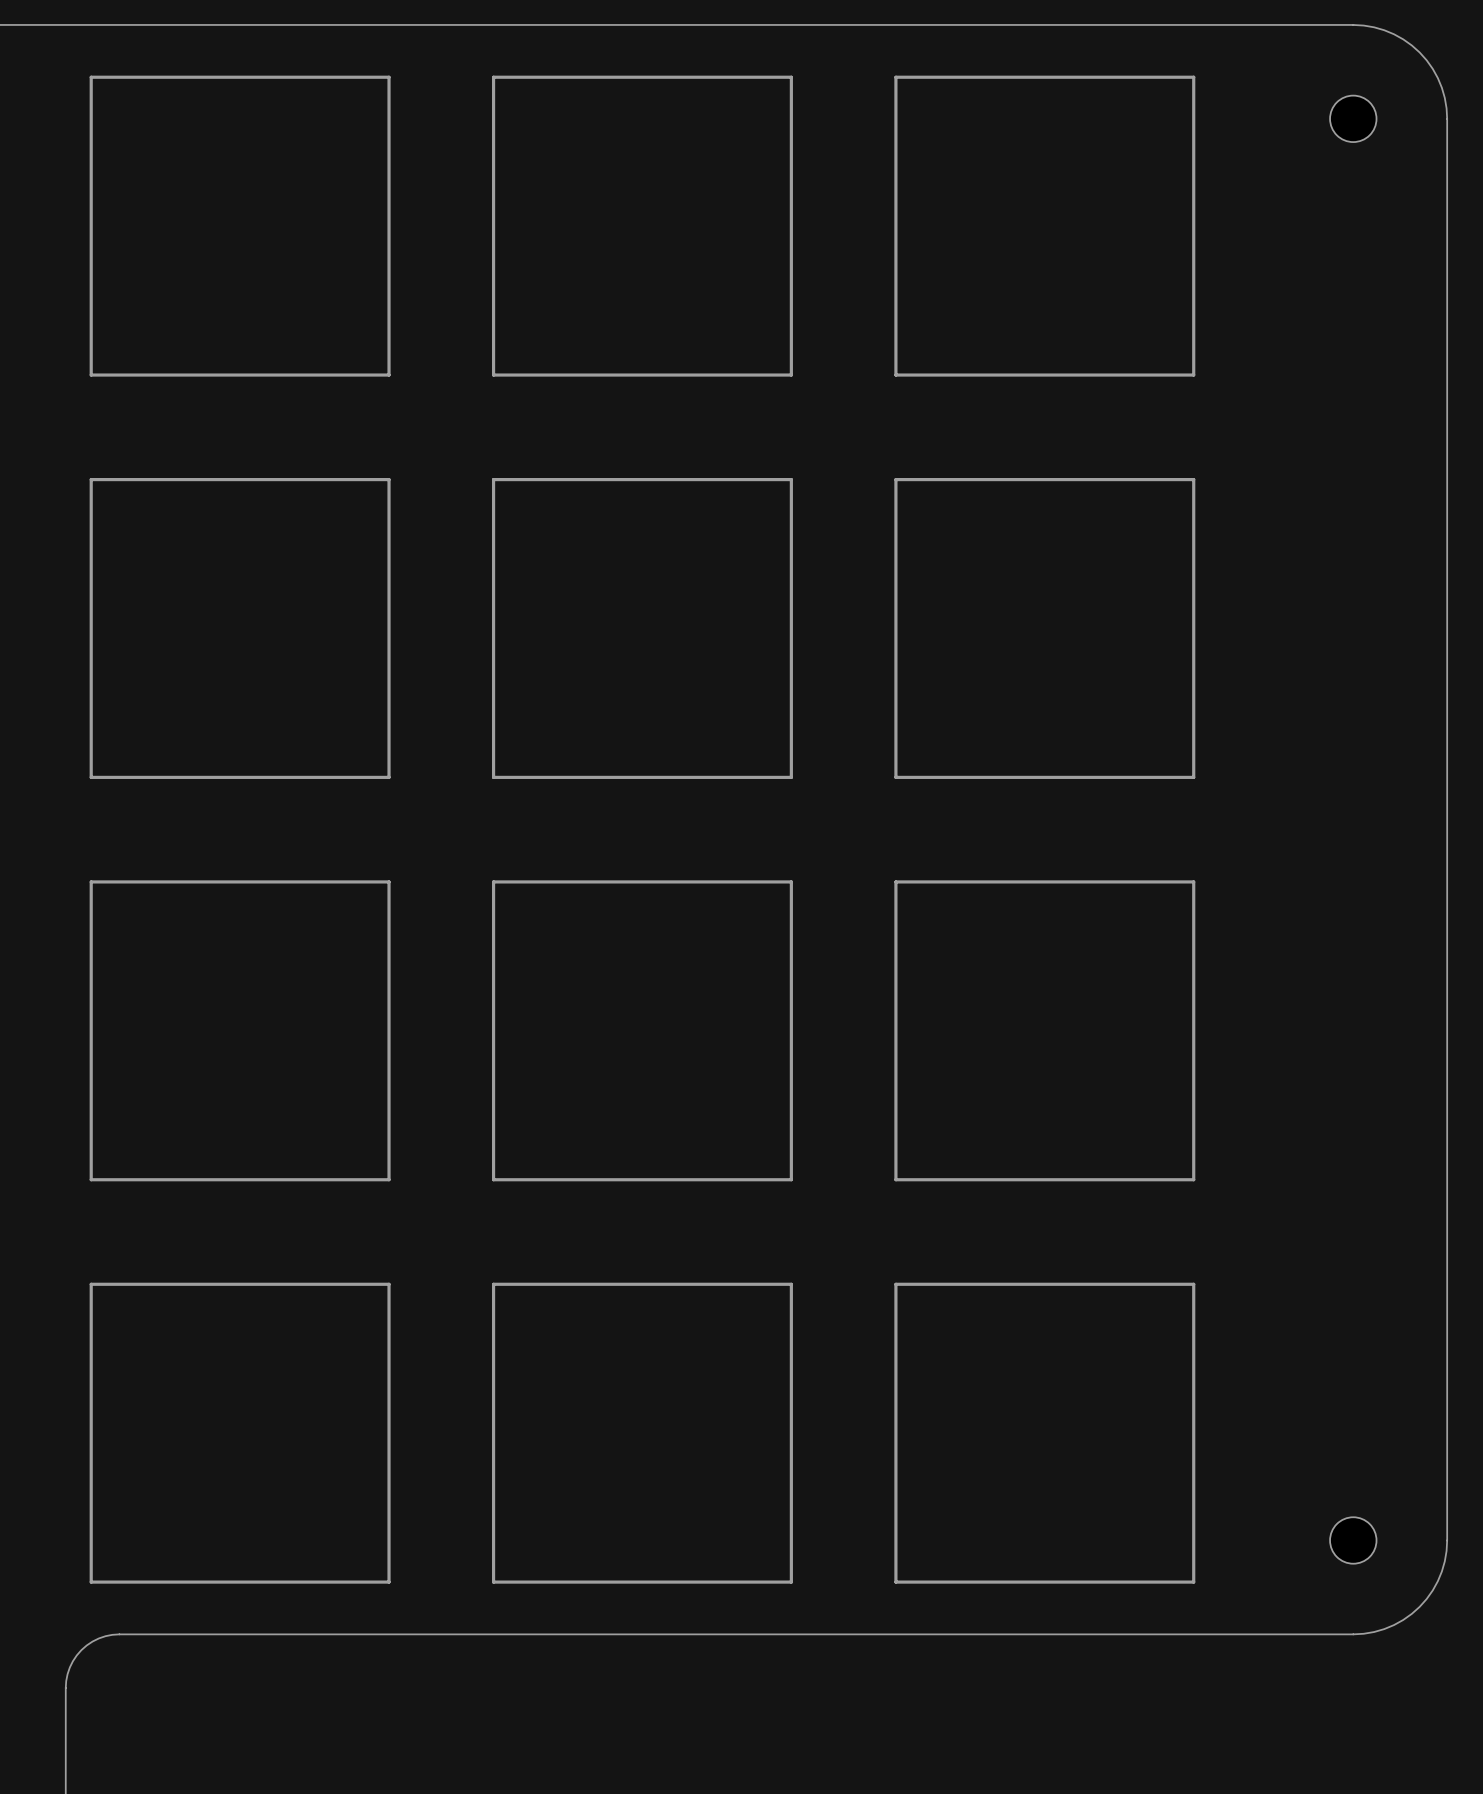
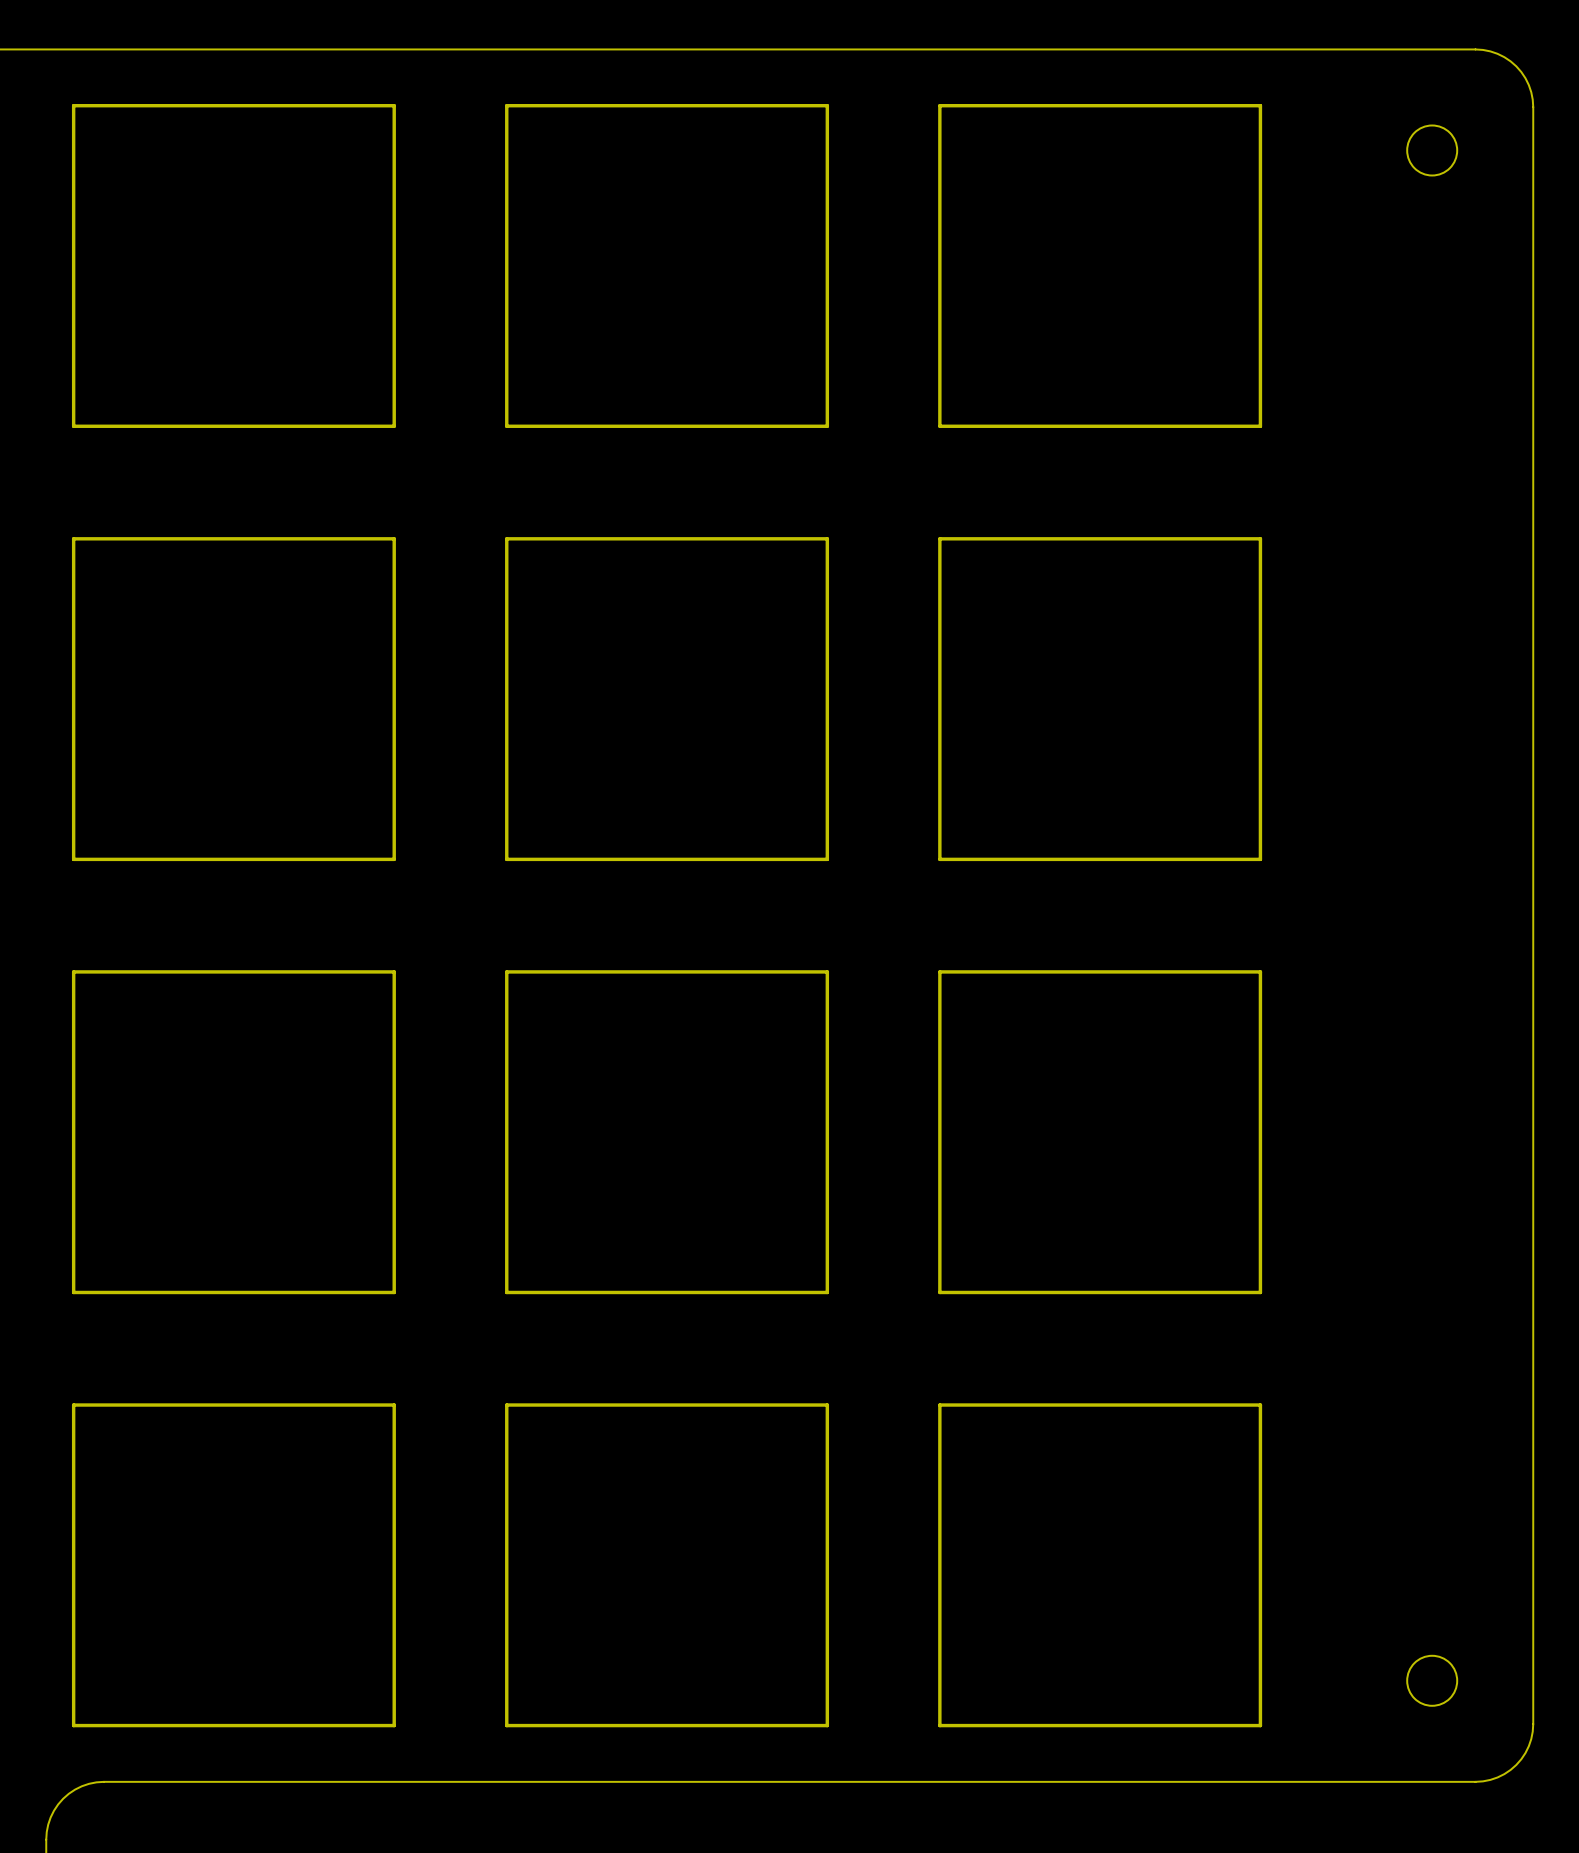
board edge: (1353, 24) (1374, 27) (1394, 34) (1419, 52) (1432, 68) (1441, 87) (1447, 118) -> (1432, 49) (1490, 51) (1504, 57) (1516, 66) (1525, 78) (1531, 92) (1533, 150)
board edge: (1447, 1540) (1441, 1571) (1432, 1590) (1419, 1606) (1394, 1625) (1374, 1632) (1353, 1634) -> (1533, 1680) (1531, 1739) (1525, 1752) (1516, 1764) (1504, 1774) (1490, 1779) (1432, 1781)

